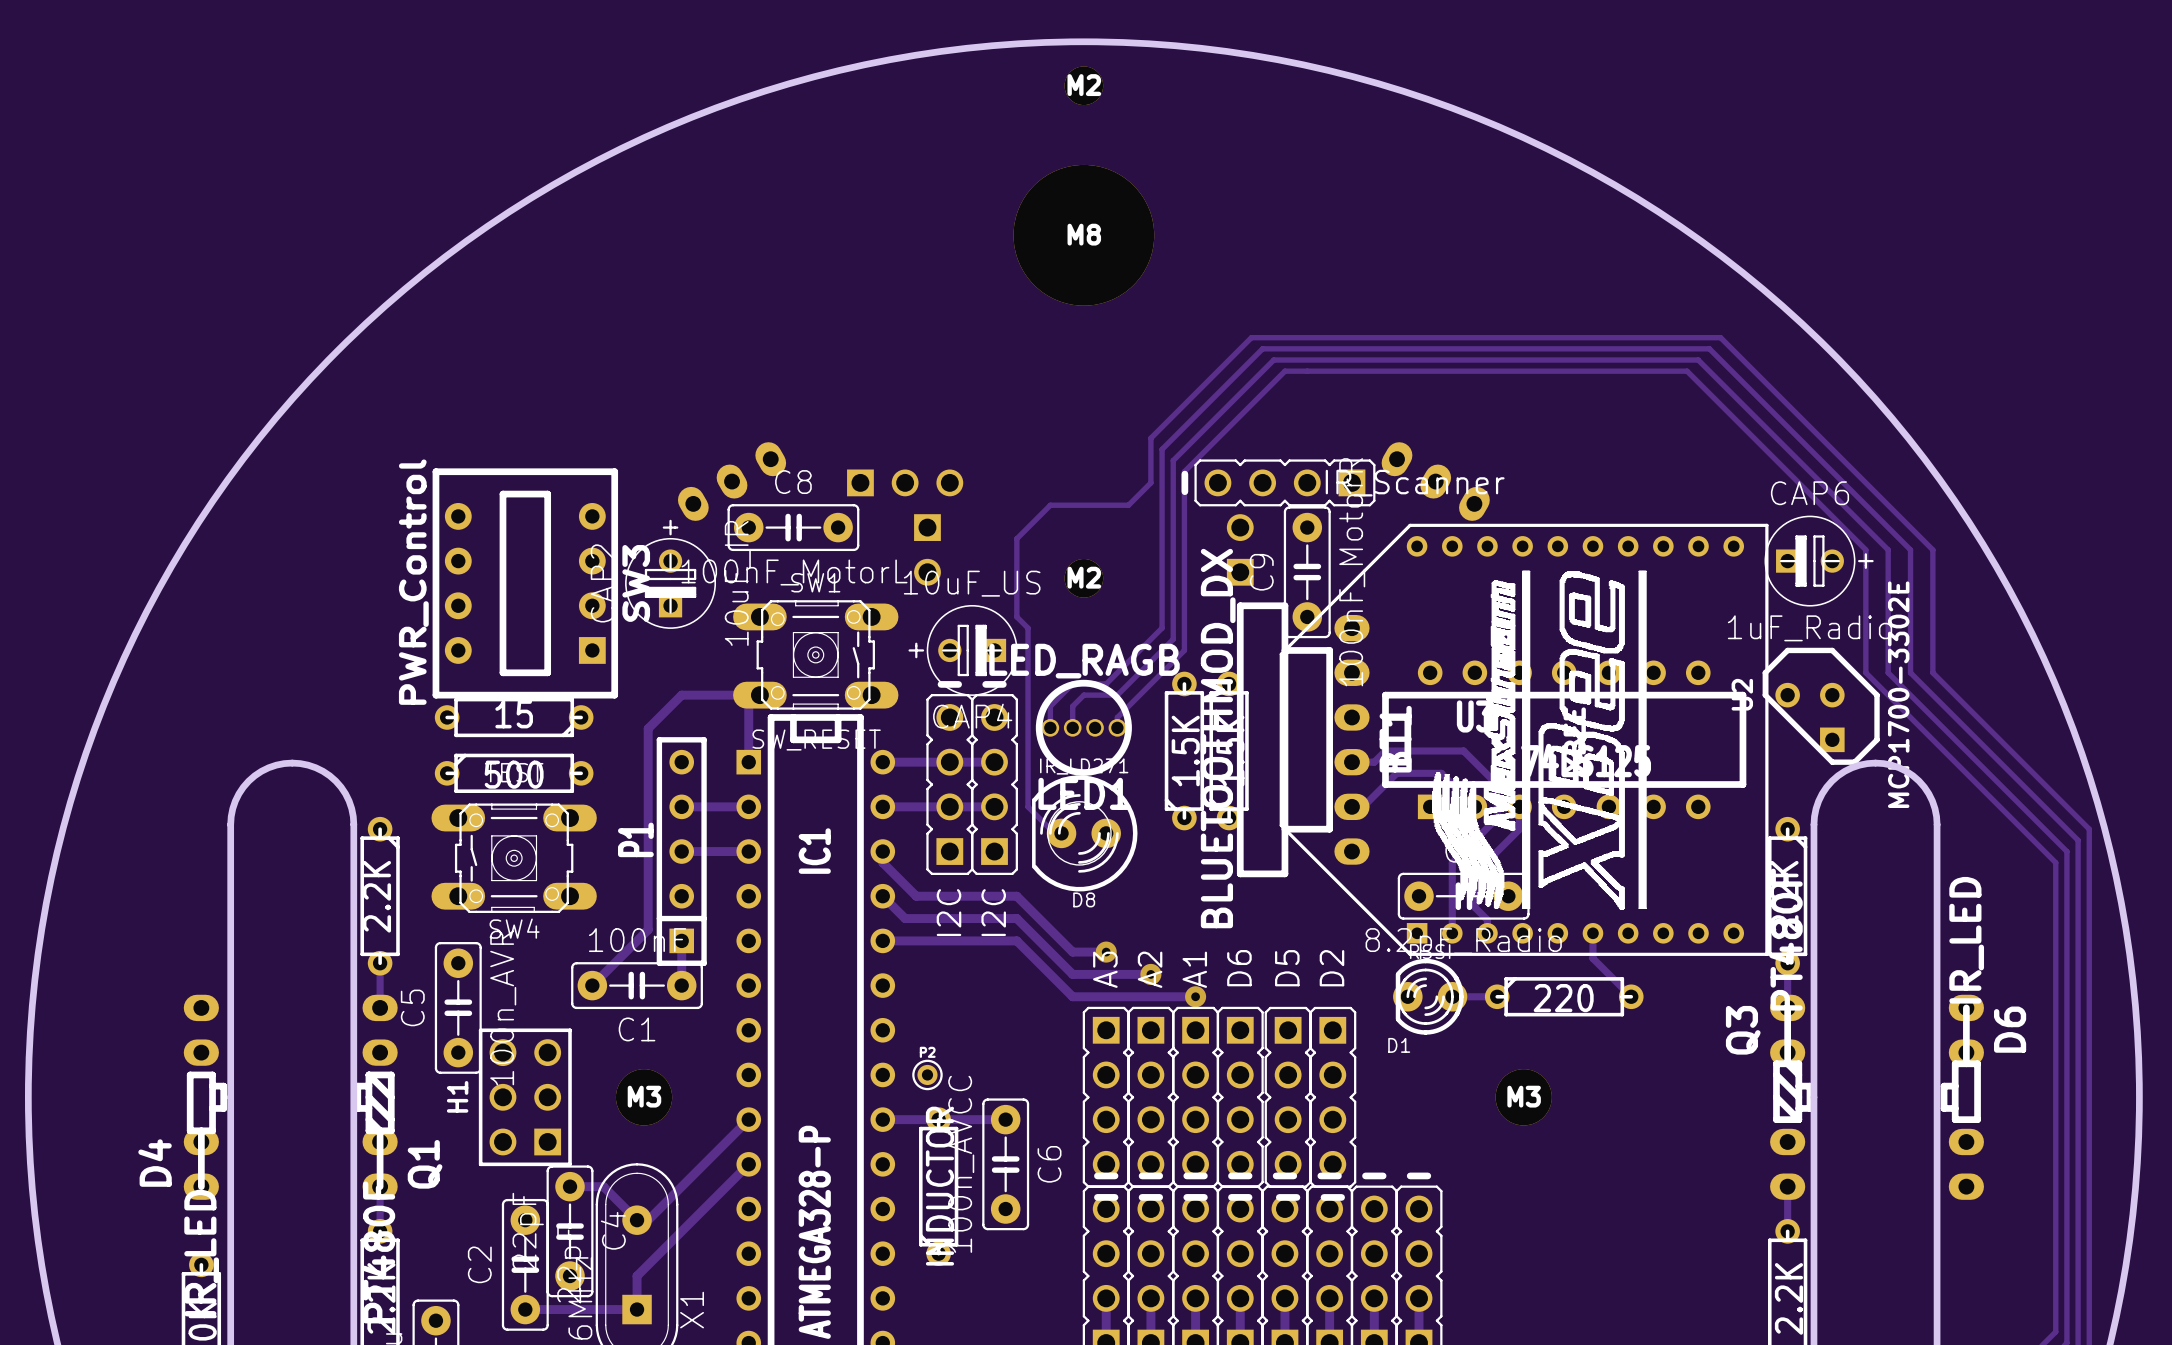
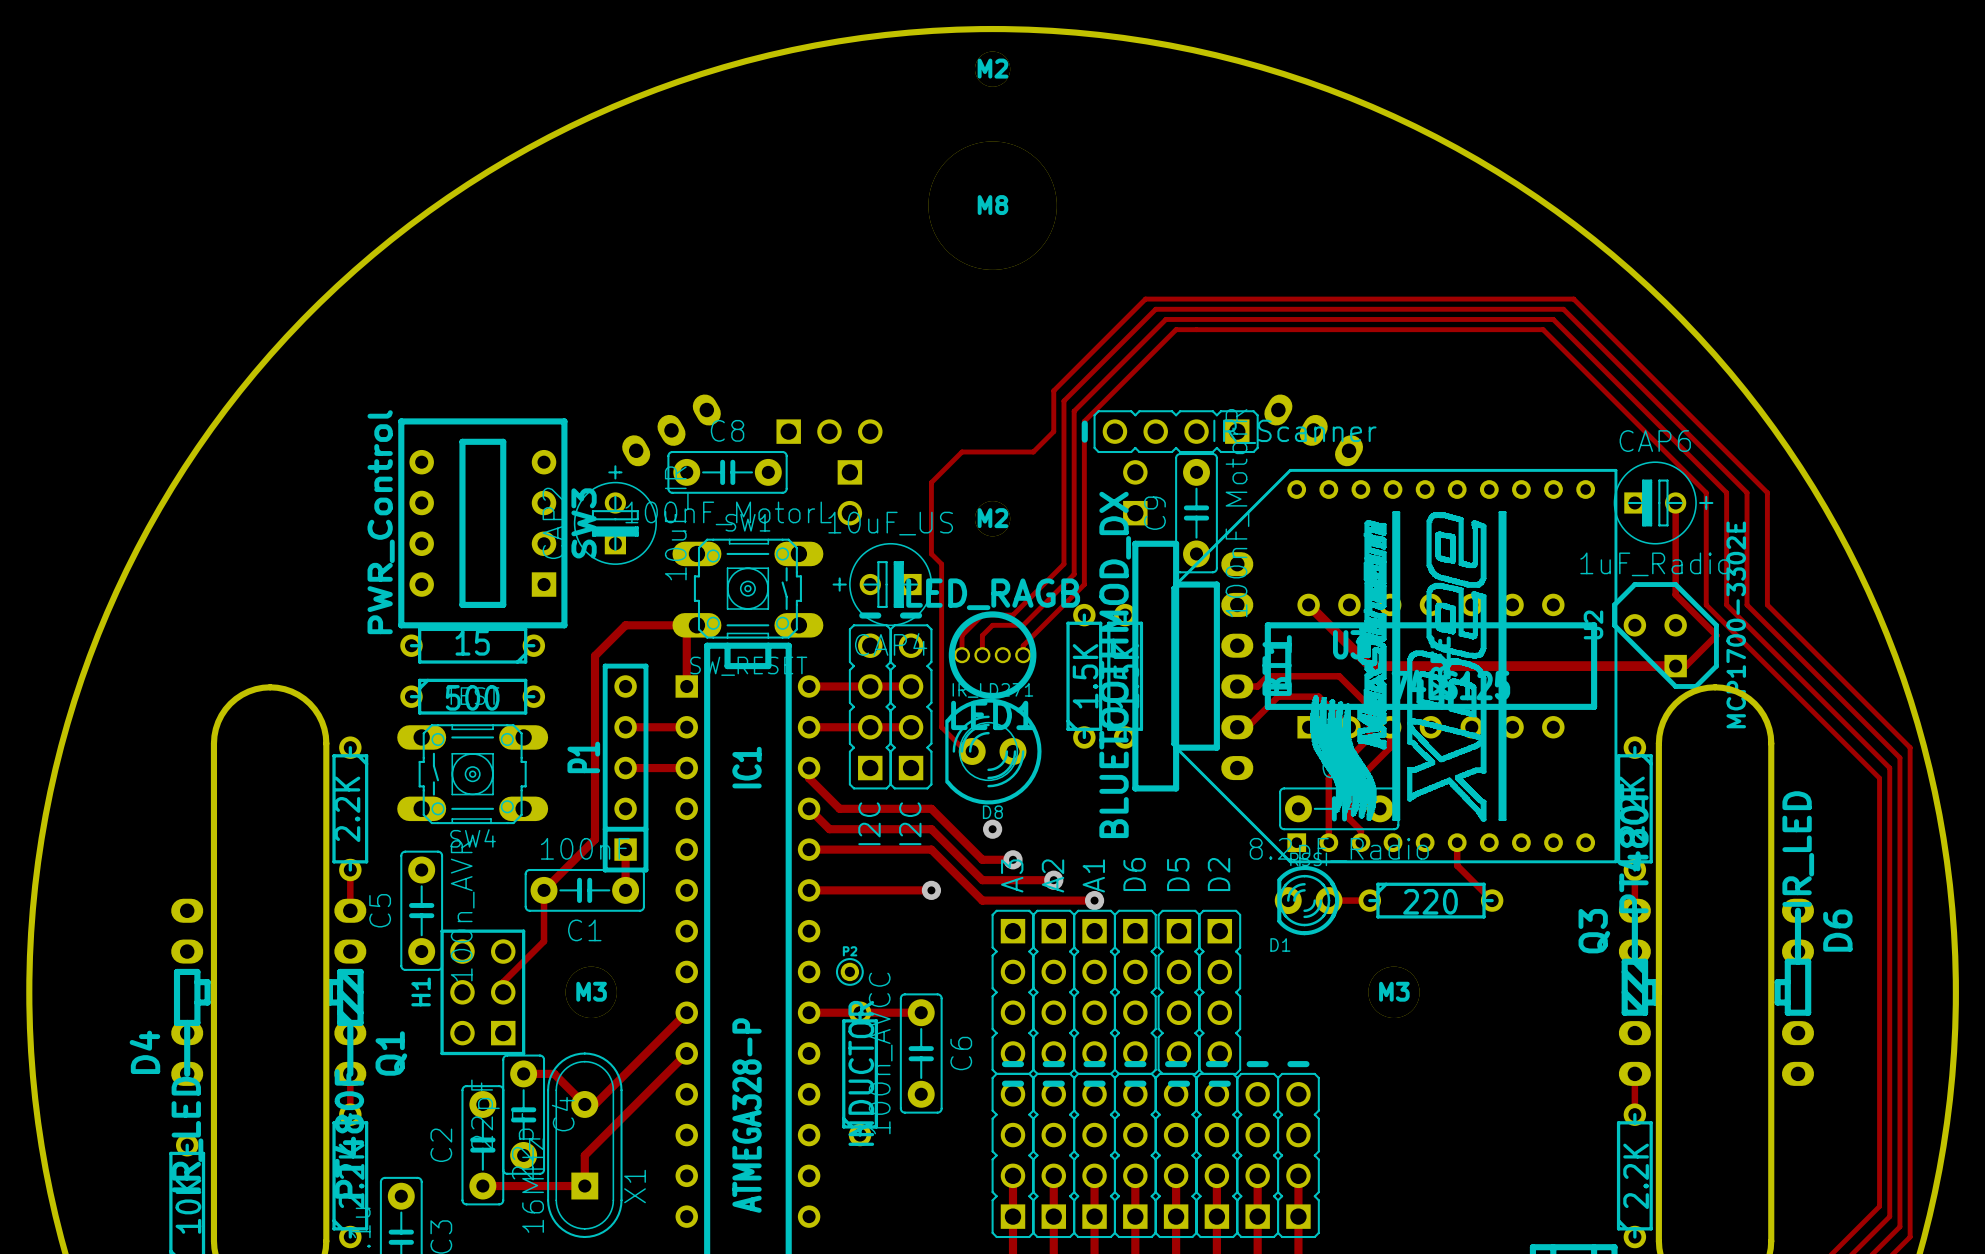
track: none -> (1675, 502) (1675, 594) (1716, 635) (1685, 666) (1369, 666) (1308, 604)
via: none -> (992, 829)
track: none -> (544, 890) (544, 941) (503, 982) (503, 992)
track: none -> (809, 890) (931, 890)
via: none -> (931, 890)

